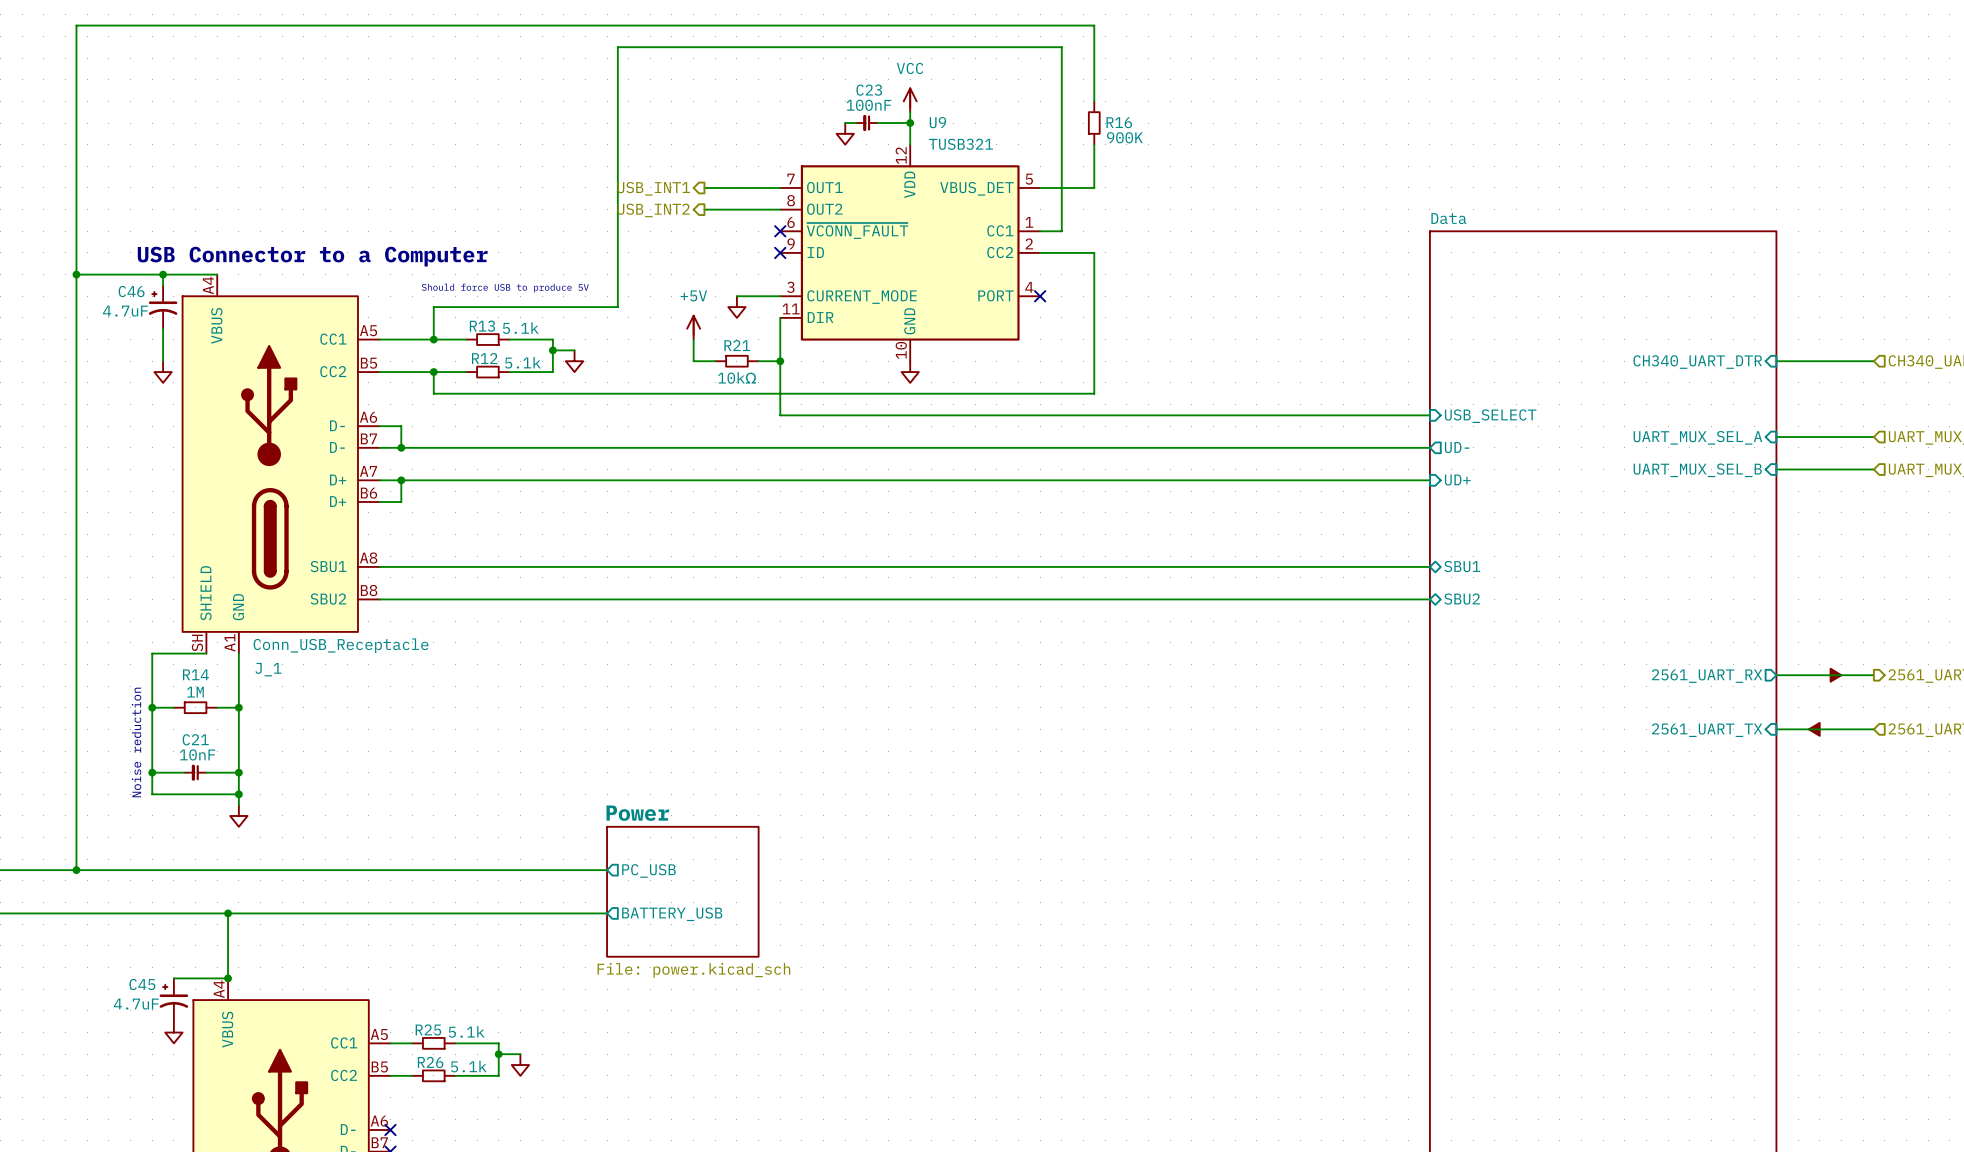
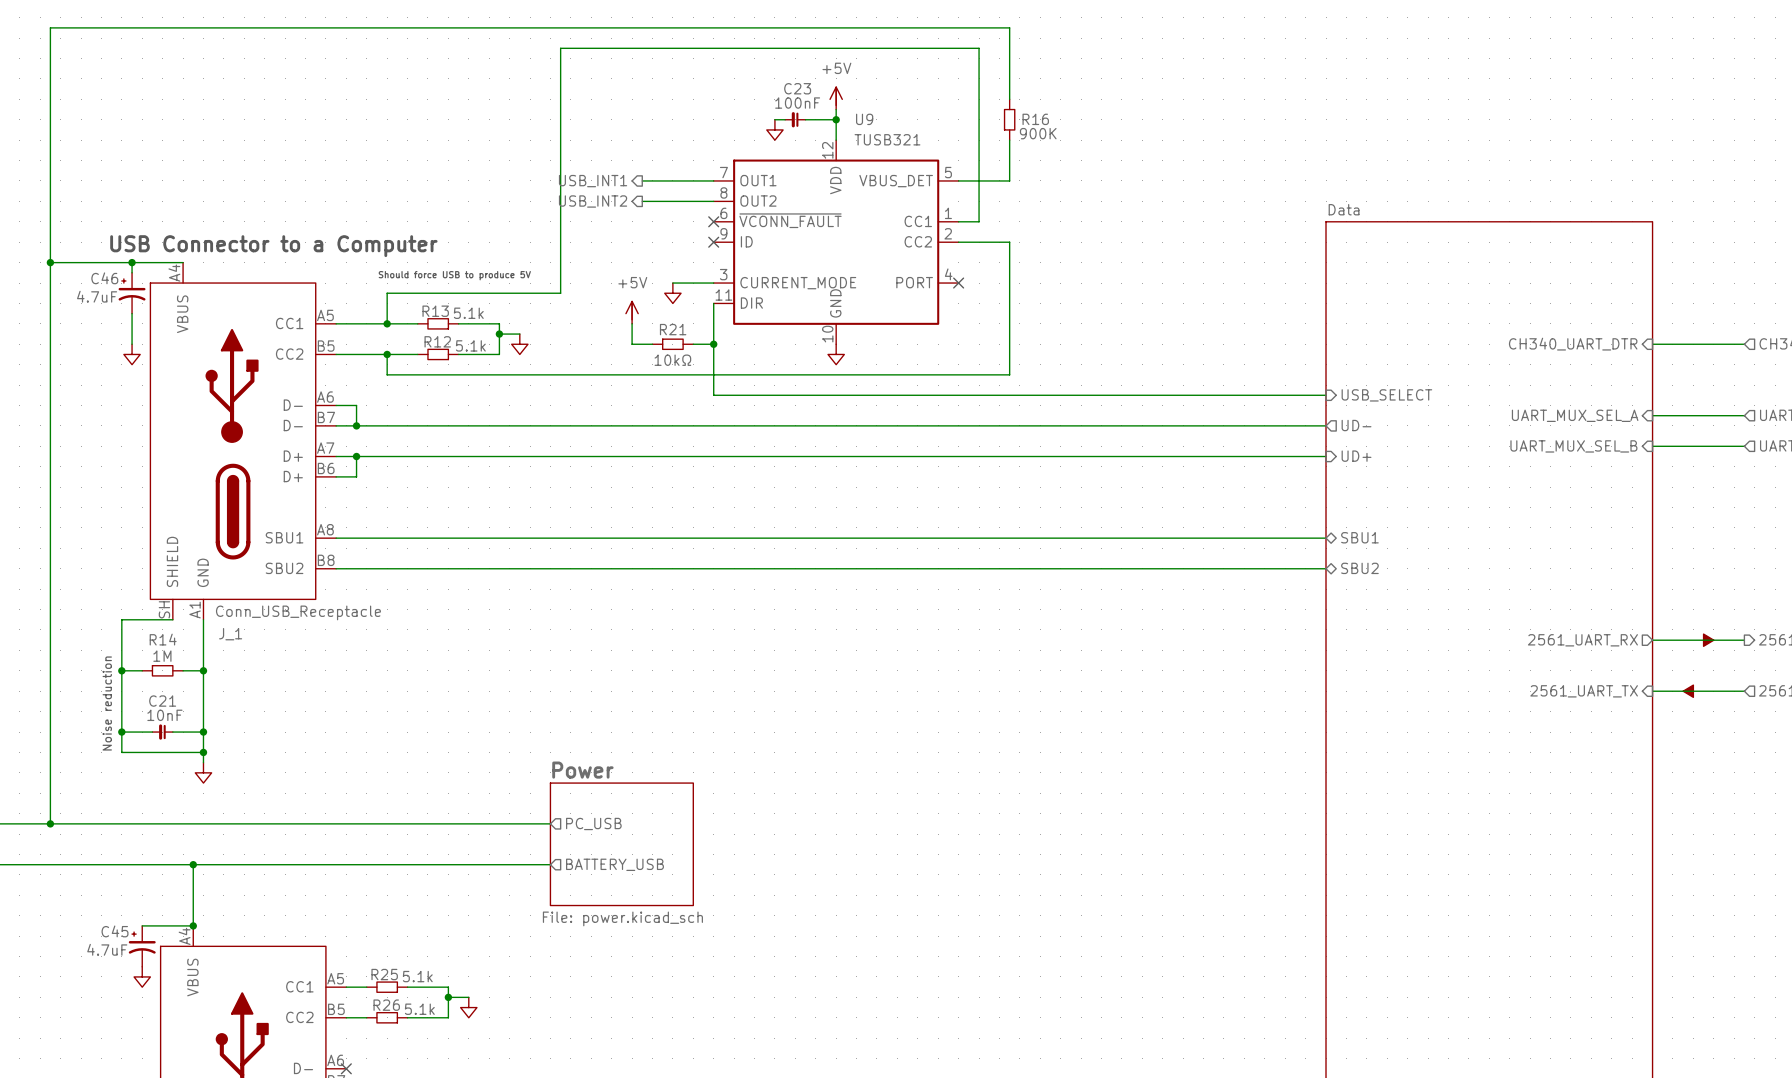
power symbol: VCC (910, 100) -> +5V (836, 98)

